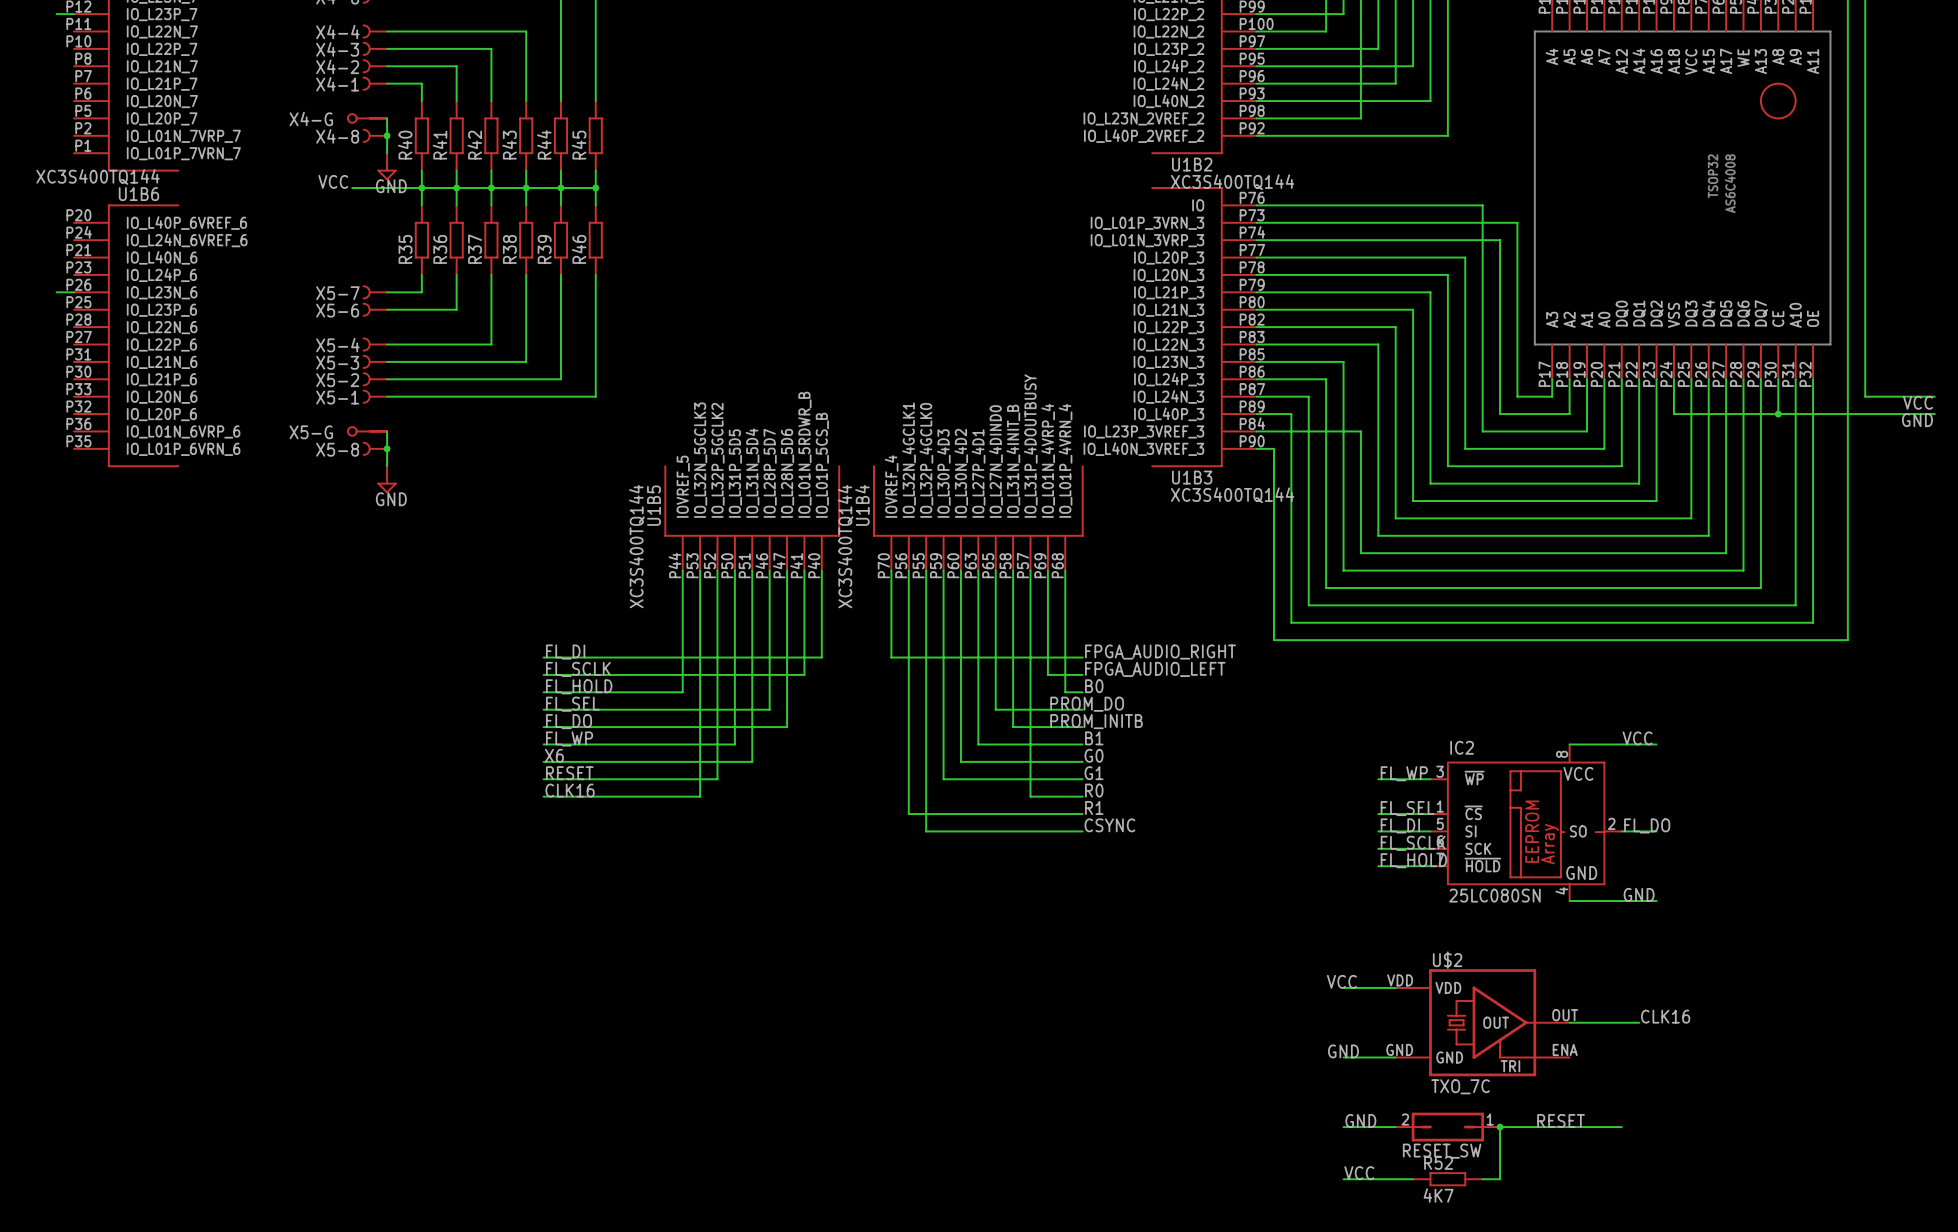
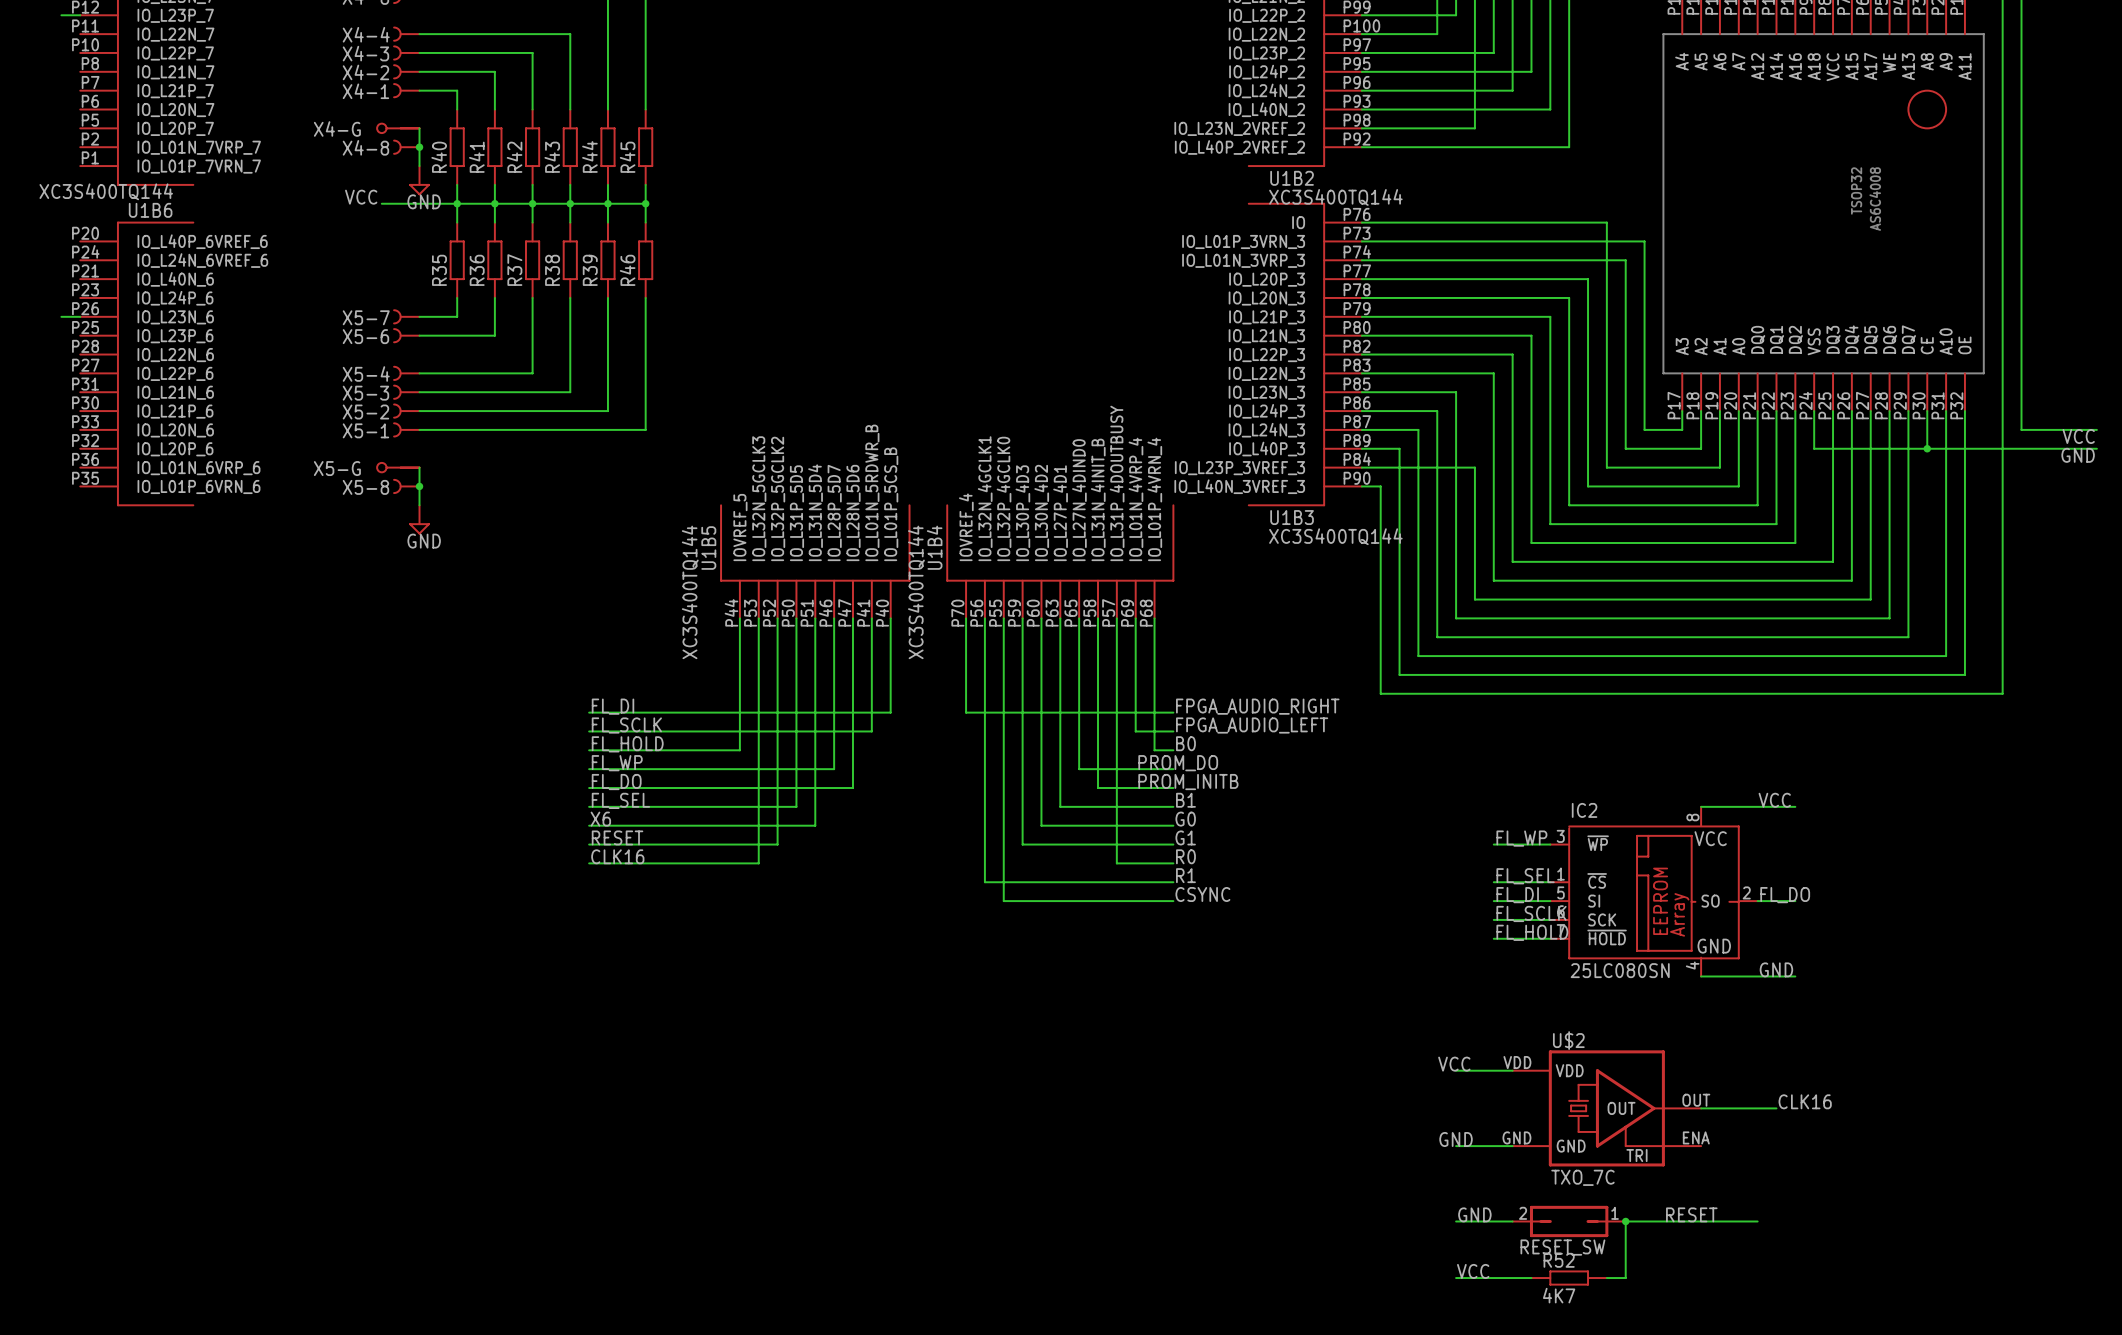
label: FL_SEL (572, 704) -> FL_WP (617, 763)
label: FL_WP (569, 738) -> FL_SEL (620, 800)

